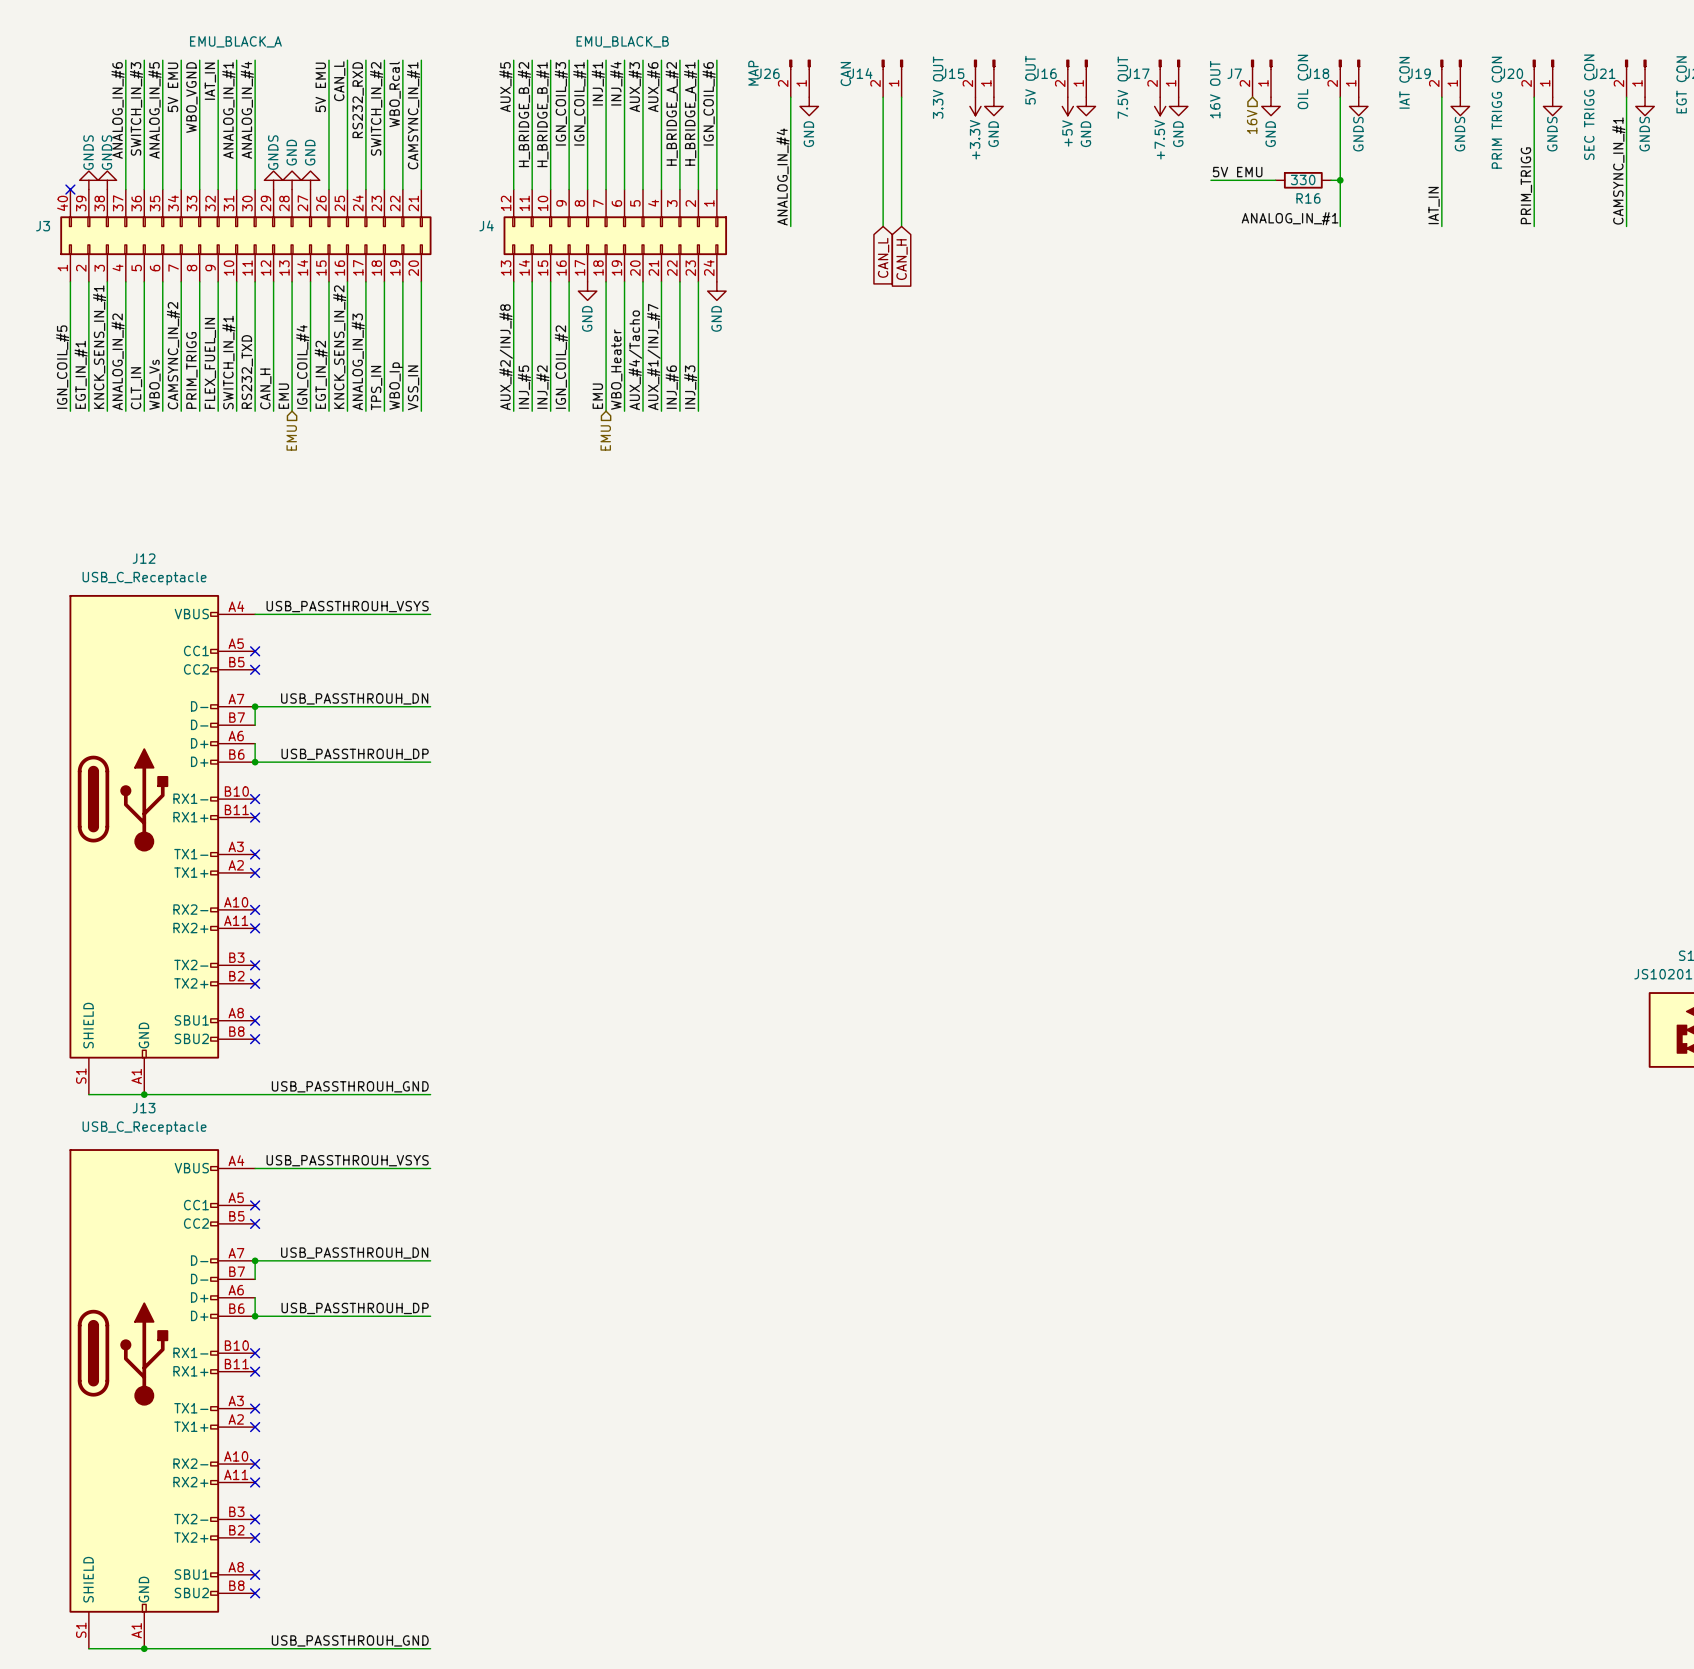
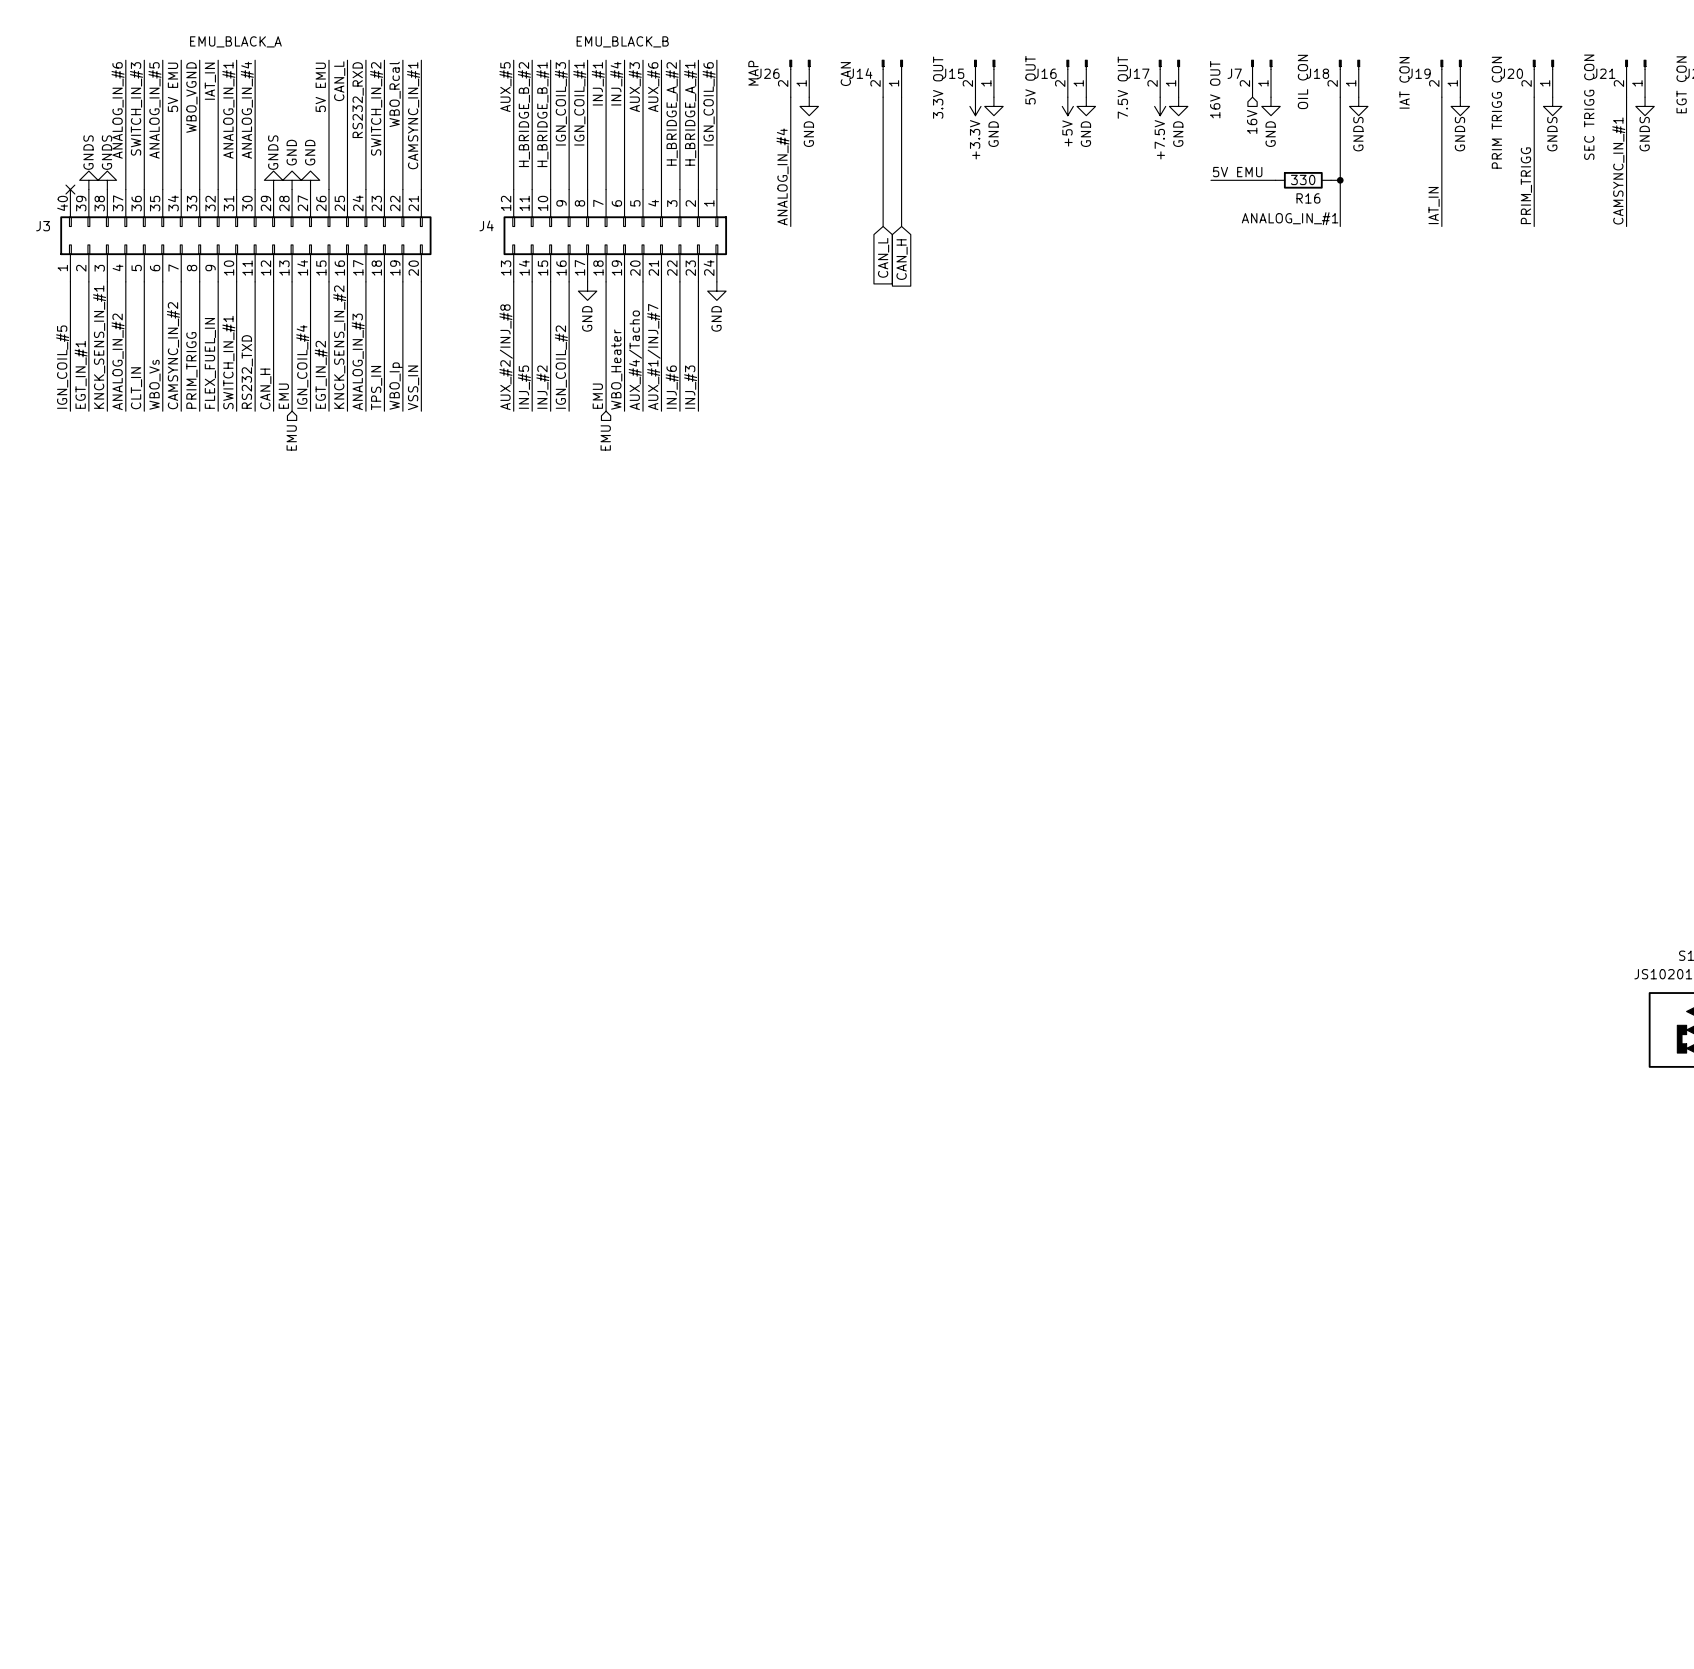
label: USB_PASSTHROUH_VSYS (347, 606) -> none
wire: (255, 614) (430, 614) -> none
no-connect mark: (255, 651) -> none
no-connect mark: (255, 669) -> none
label: USB_PASSTHROUH_DN (354, 698) -> none
junction: (255, 706) -> none
wire: (430, 706) (255, 706) (255, 725) -> none
wire: (255, 743) (255, 762) (430, 762) -> none
label: USB_PASSTHROUH_DP (355, 754) -> none
junction: (255, 762) -> none
no-connect mark: (255, 799) -> none
no-connect mark: (255, 817) -> none
J12: USB_C_Receptacle (162, 844) -> none
no-connect mark: (255, 854) -> none
no-connect mark: (255, 872) -> none
no-connect mark: (255, 909) -> none
no-connect mark: (255, 928) -> none
no-connect mark: (255, 965) -> none
no-connect mark: (255, 983) -> none
no-connect mark: (255, 1020) -> none
no-connect mark: (255, 1039) -> none
label: USB_PASSTHROUH_GND (350, 1086) -> none
wire: (88, 1094) (430, 1094) -> none
junction: (144, 1094) -> none
label: USB_PASSTHROUH_VSYS (347, 1160) -> none
wire: (255, 1168) (430, 1168) -> none
no-connect mark: (255, 1205) -> none
no-connect mark: (255, 1223) -> none
label: USB_PASSTHROUH_DN (354, 1253) -> none
junction: (255, 1260) -> none
wire: (430, 1260) (255, 1260) (255, 1279) -> none
wire: (255, 1297) (255, 1316) (430, 1316) -> none
label: USB_PASSTHROUH_DP (355, 1308) -> none
junction: (255, 1316) -> none
no-connect mark: (255, 1353) -> none
no-connect mark: (255, 1371) -> none
J13: USB_C_Receptacle (162, 1398) -> none
no-connect mark: (255, 1408) -> none
no-connect mark: (255, 1427) -> none
no-connect mark: (255, 1464) -> none
no-connect mark: (255, 1482) -> none
no-connect mark: (255, 1519) -> none
no-connect mark: (255, 1537) -> none
no-connect mark: (255, 1574) -> none
no-connect mark: (255, 1593) -> none
label: USB_PASSTHROUH_GND (350, 1640) -> none
wire: (88, 1648) (430, 1648) -> none
junction: (144, 1648) -> none

